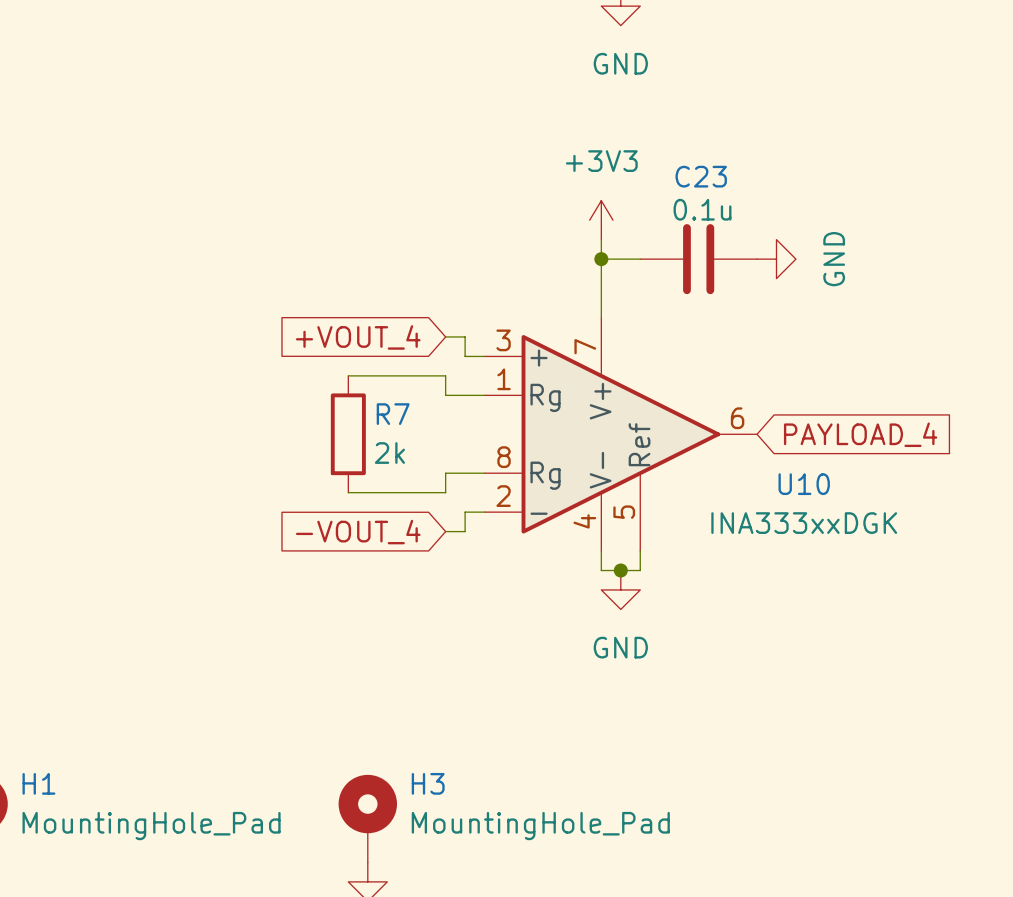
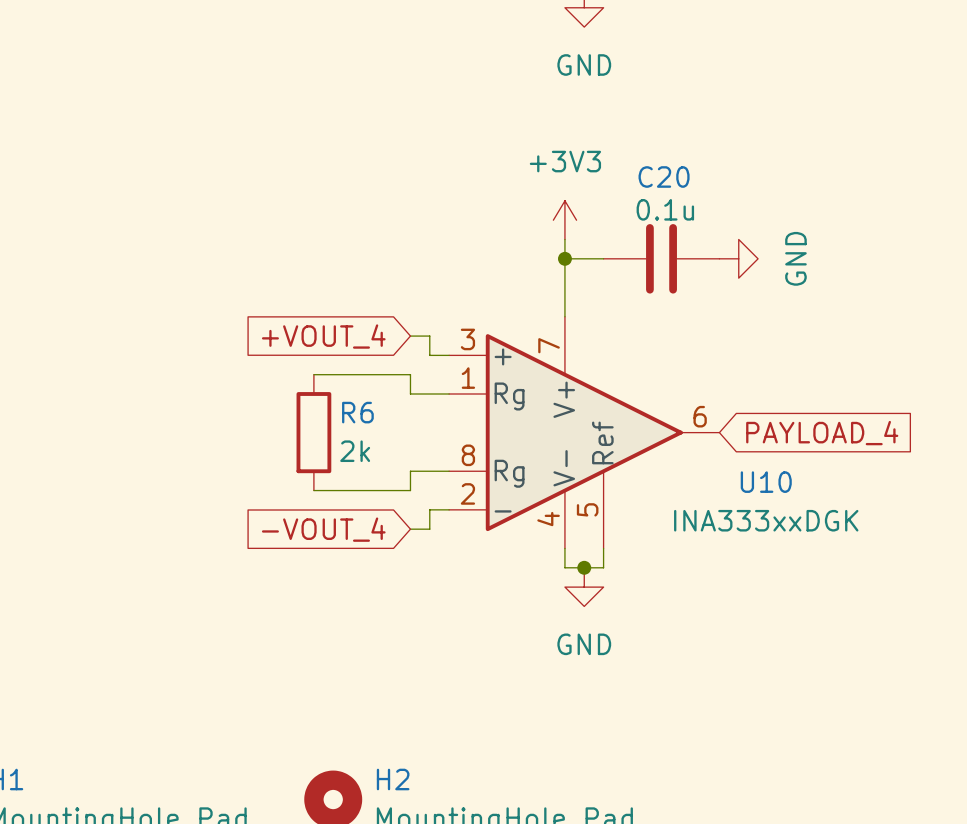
C23 name: C23 (701, 176) -> C20 (664, 176)
R7 name: R7 (393, 414) -> R6 (357, 412)
H3 name: H3 (428, 783) -> H2 (393, 779)

